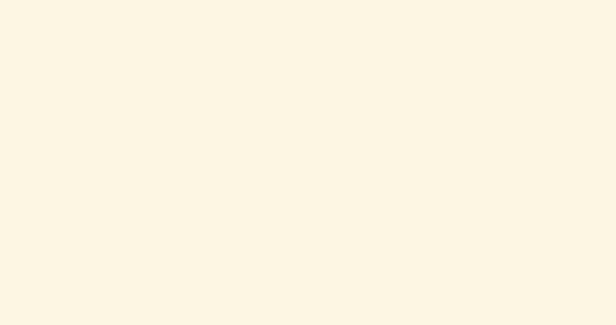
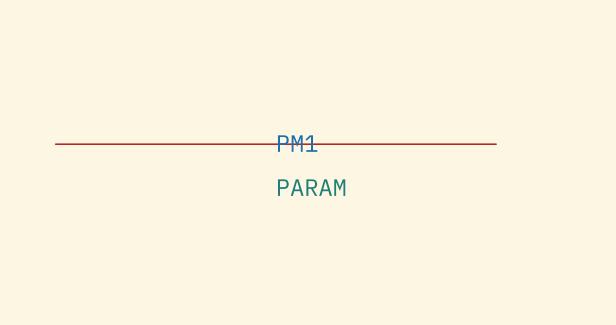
PM1: none -> PARAM (275, 144)

